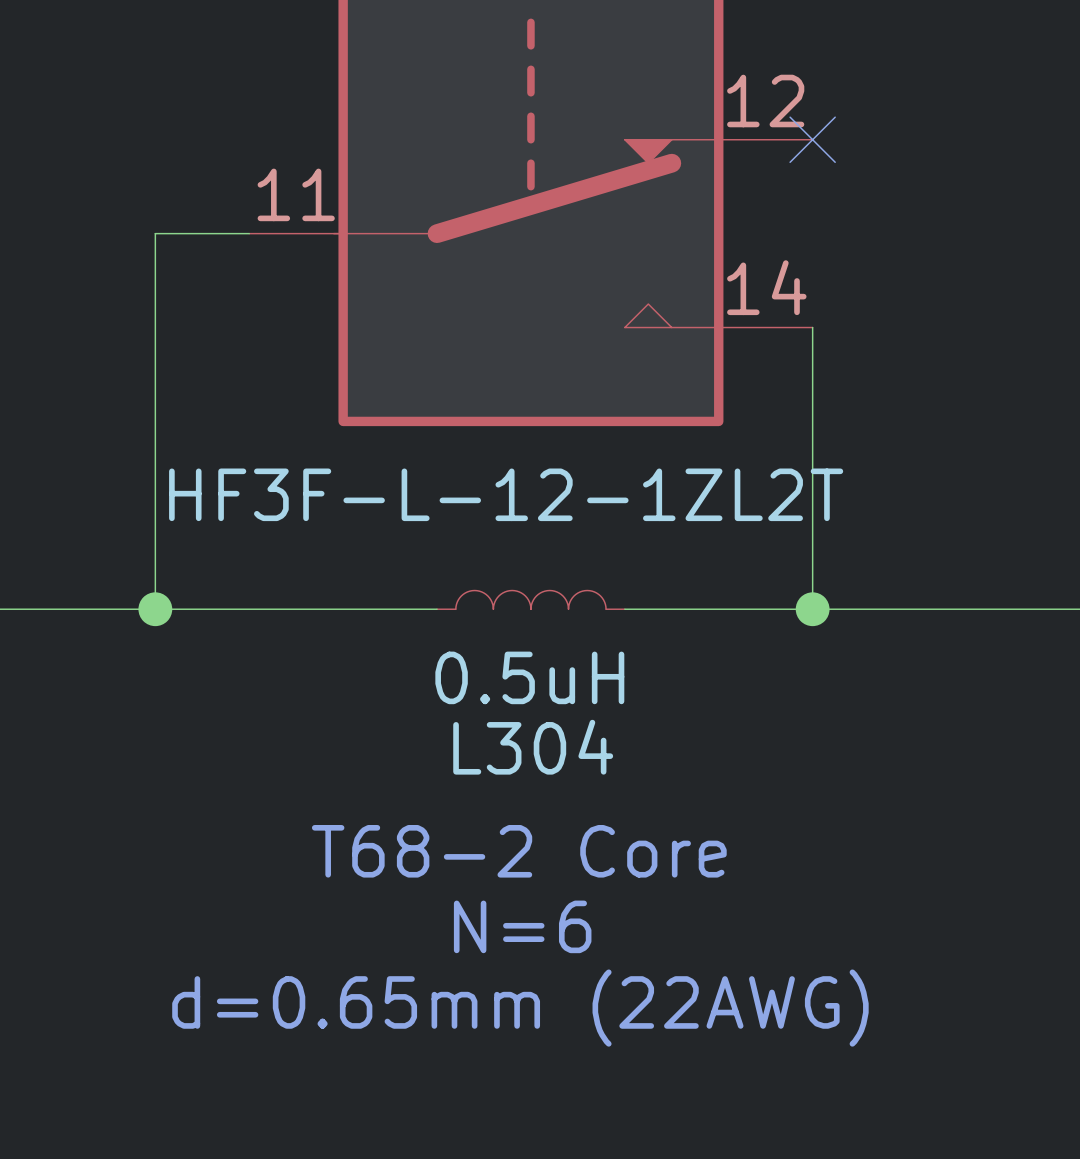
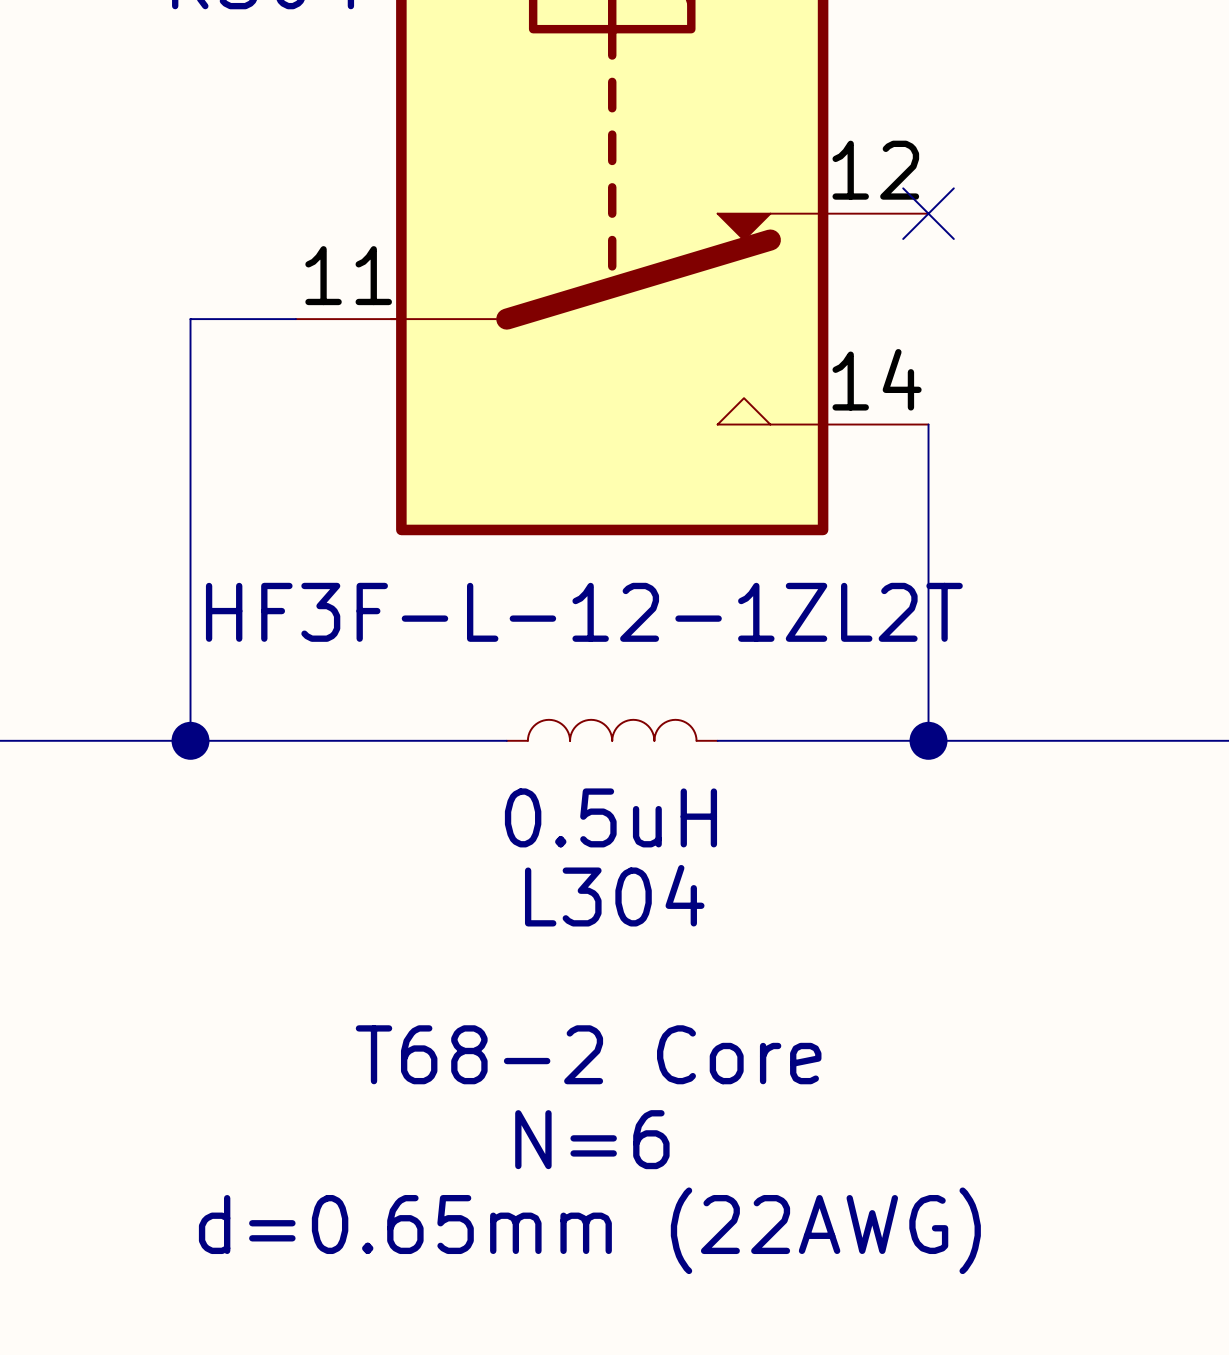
text position: T68-2 Core (519, 851) -> T68-2 Core (588, 1054)
text position: N=6 (522, 926) -> N=6 (592, 1139)
text position: d=0.65mm (22AWG) (520, 1008) -> d=0.65mm (22AWG) (589, 1230)

